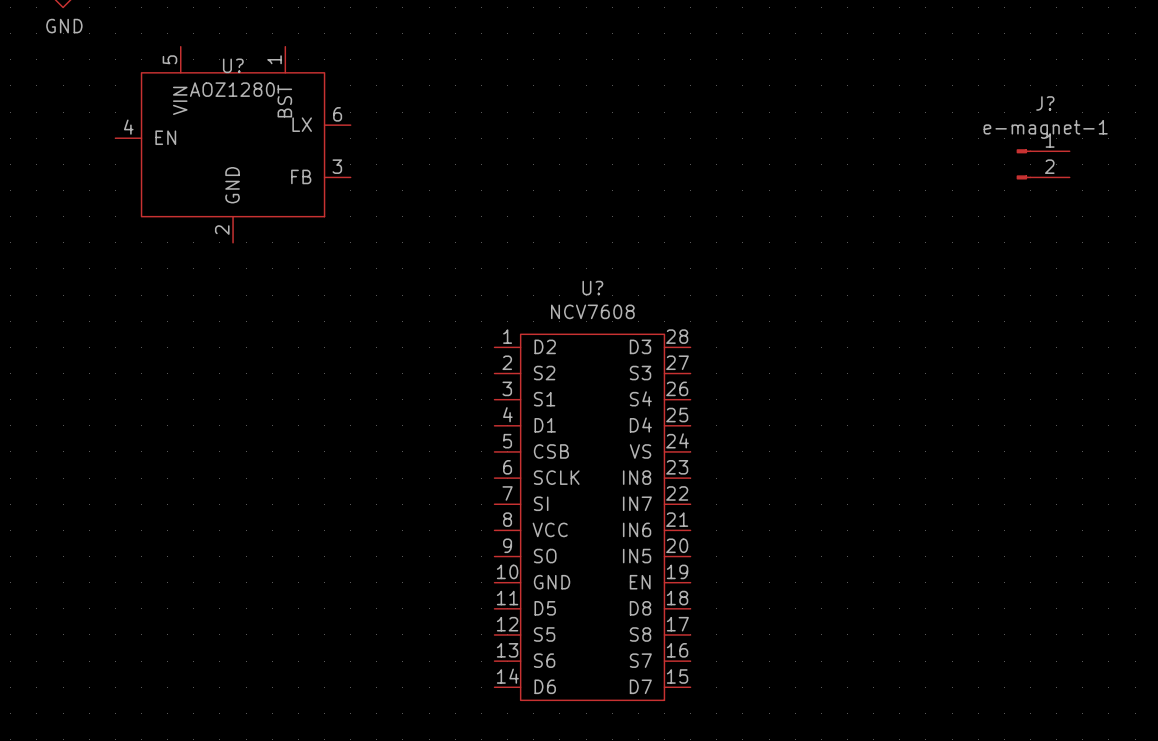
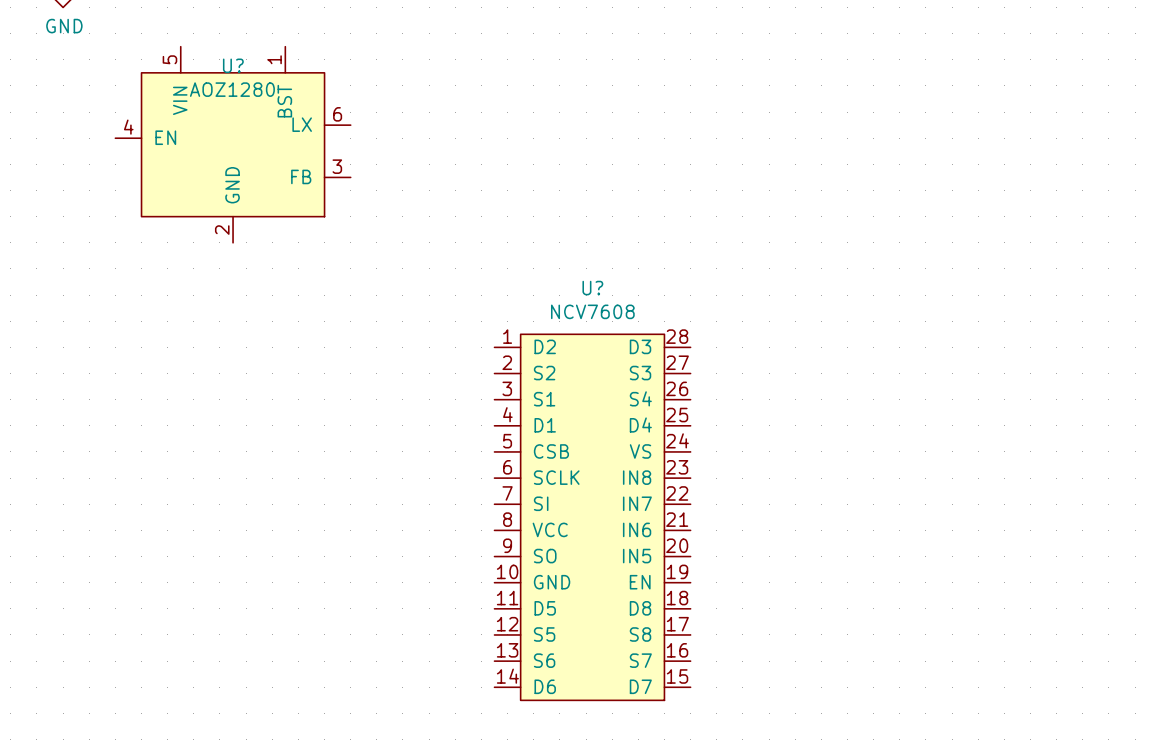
J?: e-magnet-1 (1043, 164) -> none

